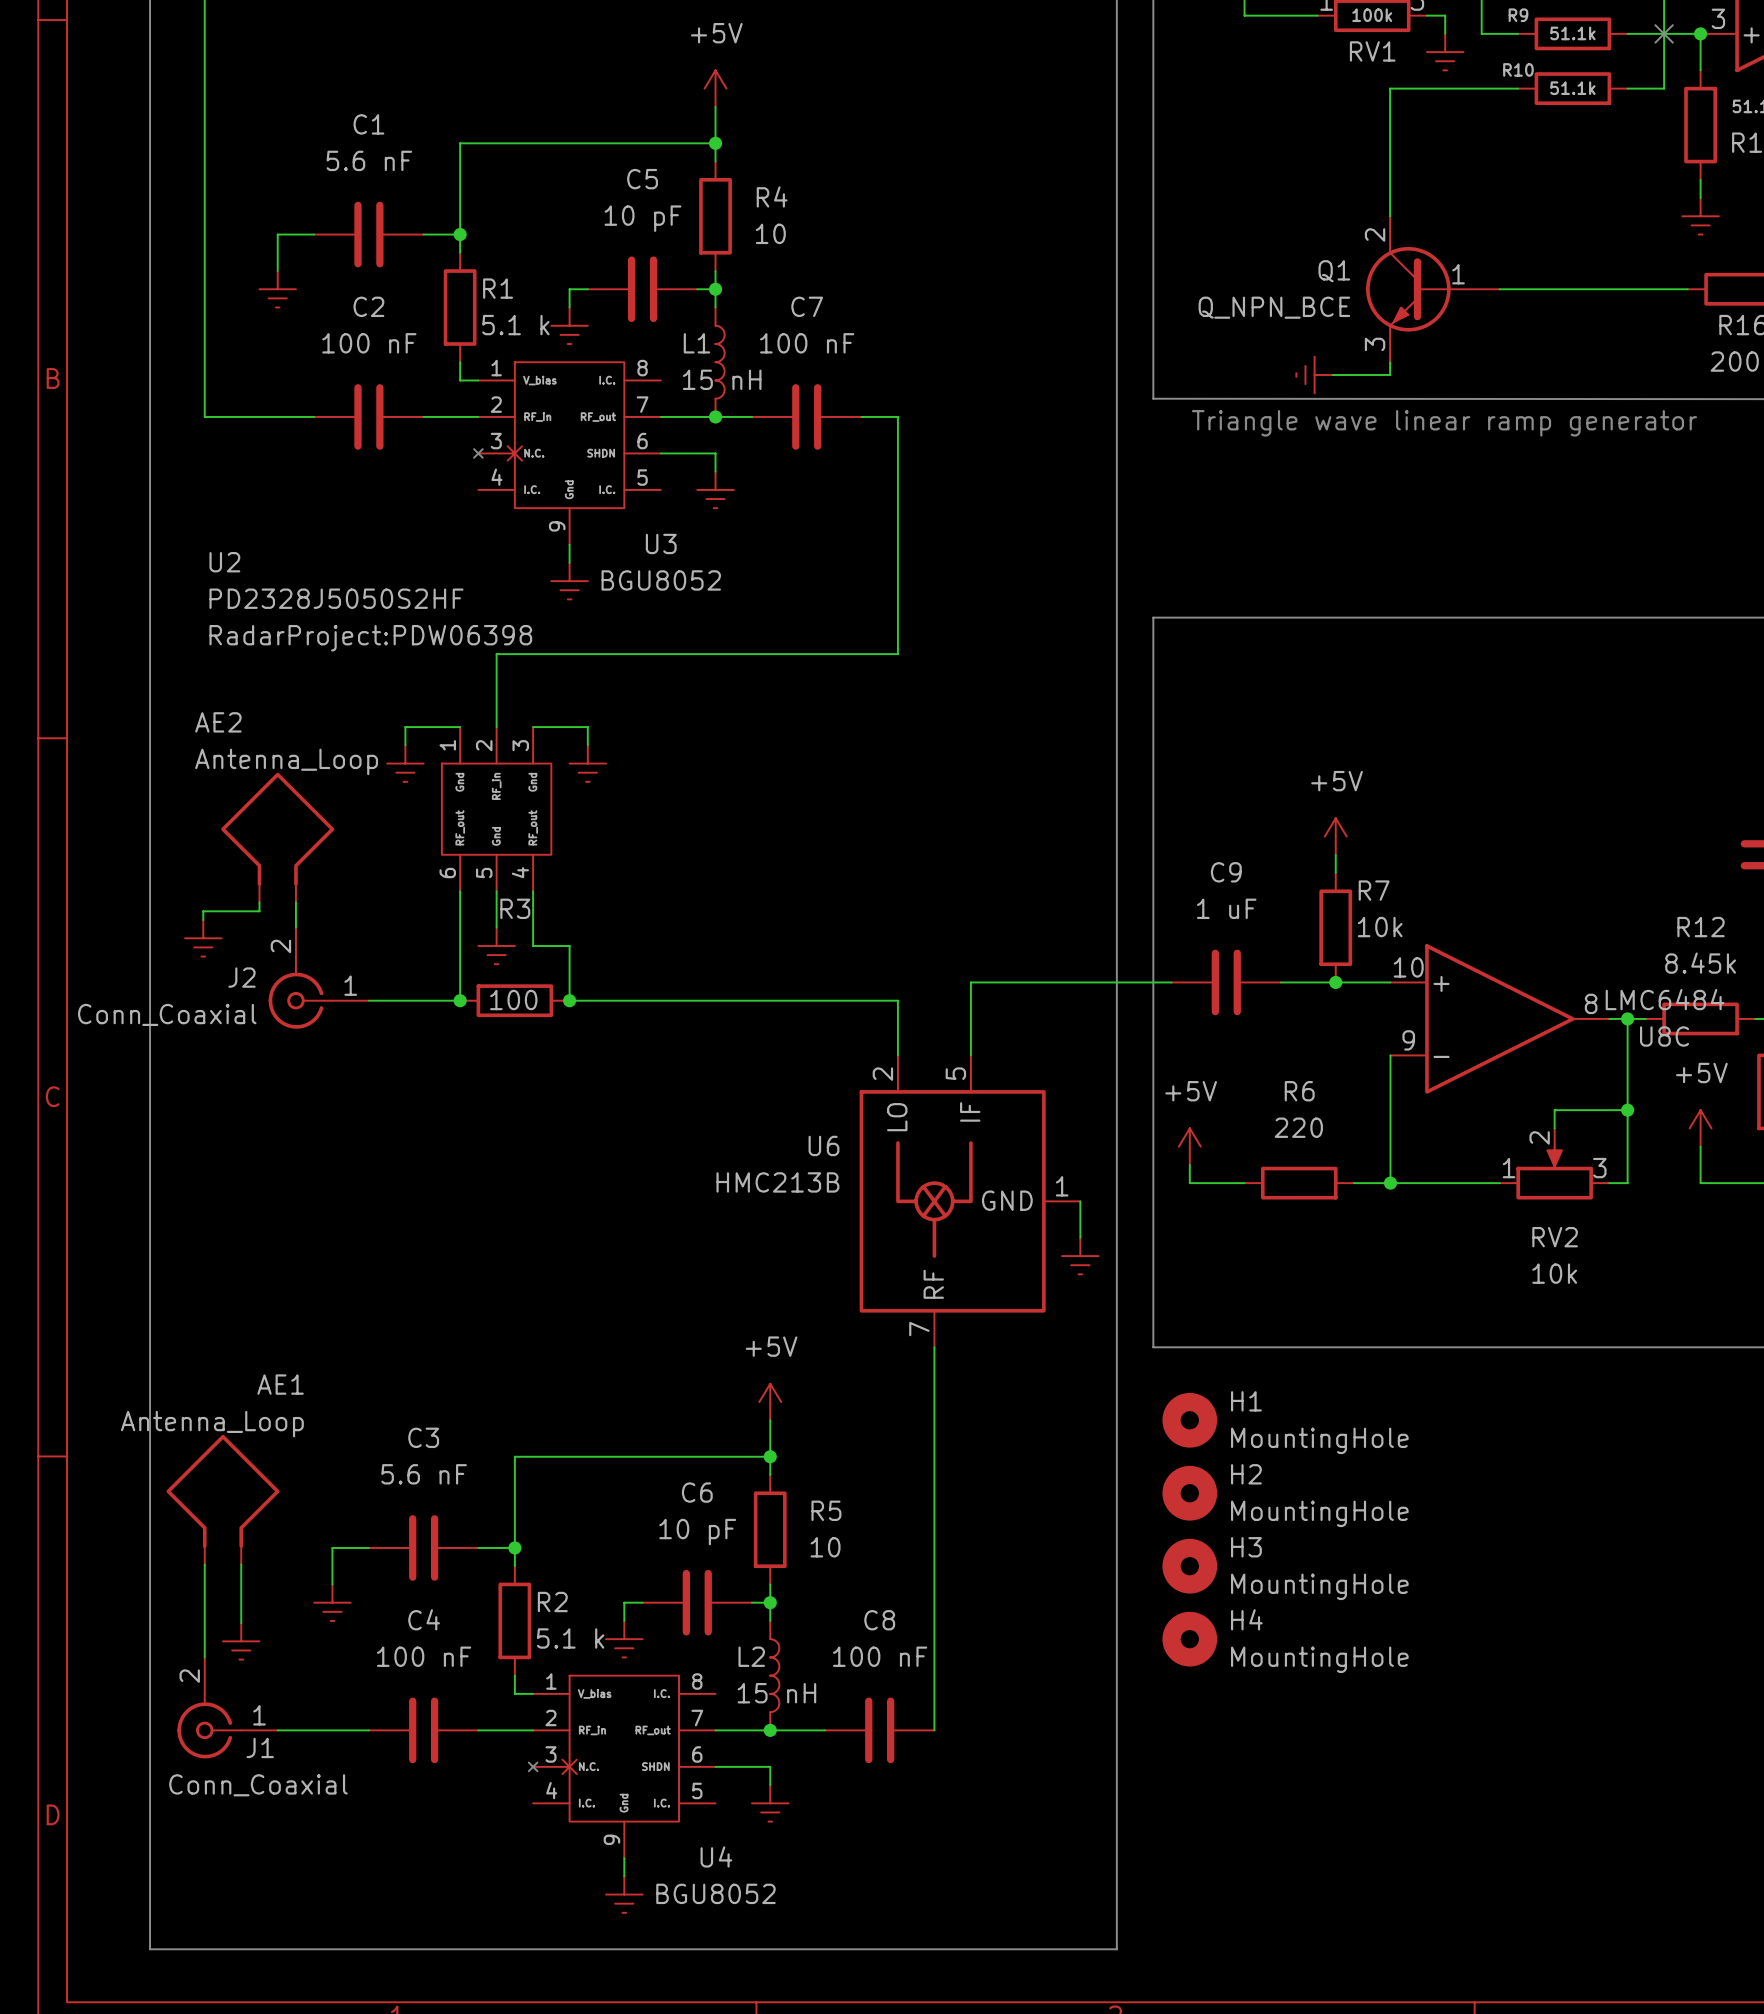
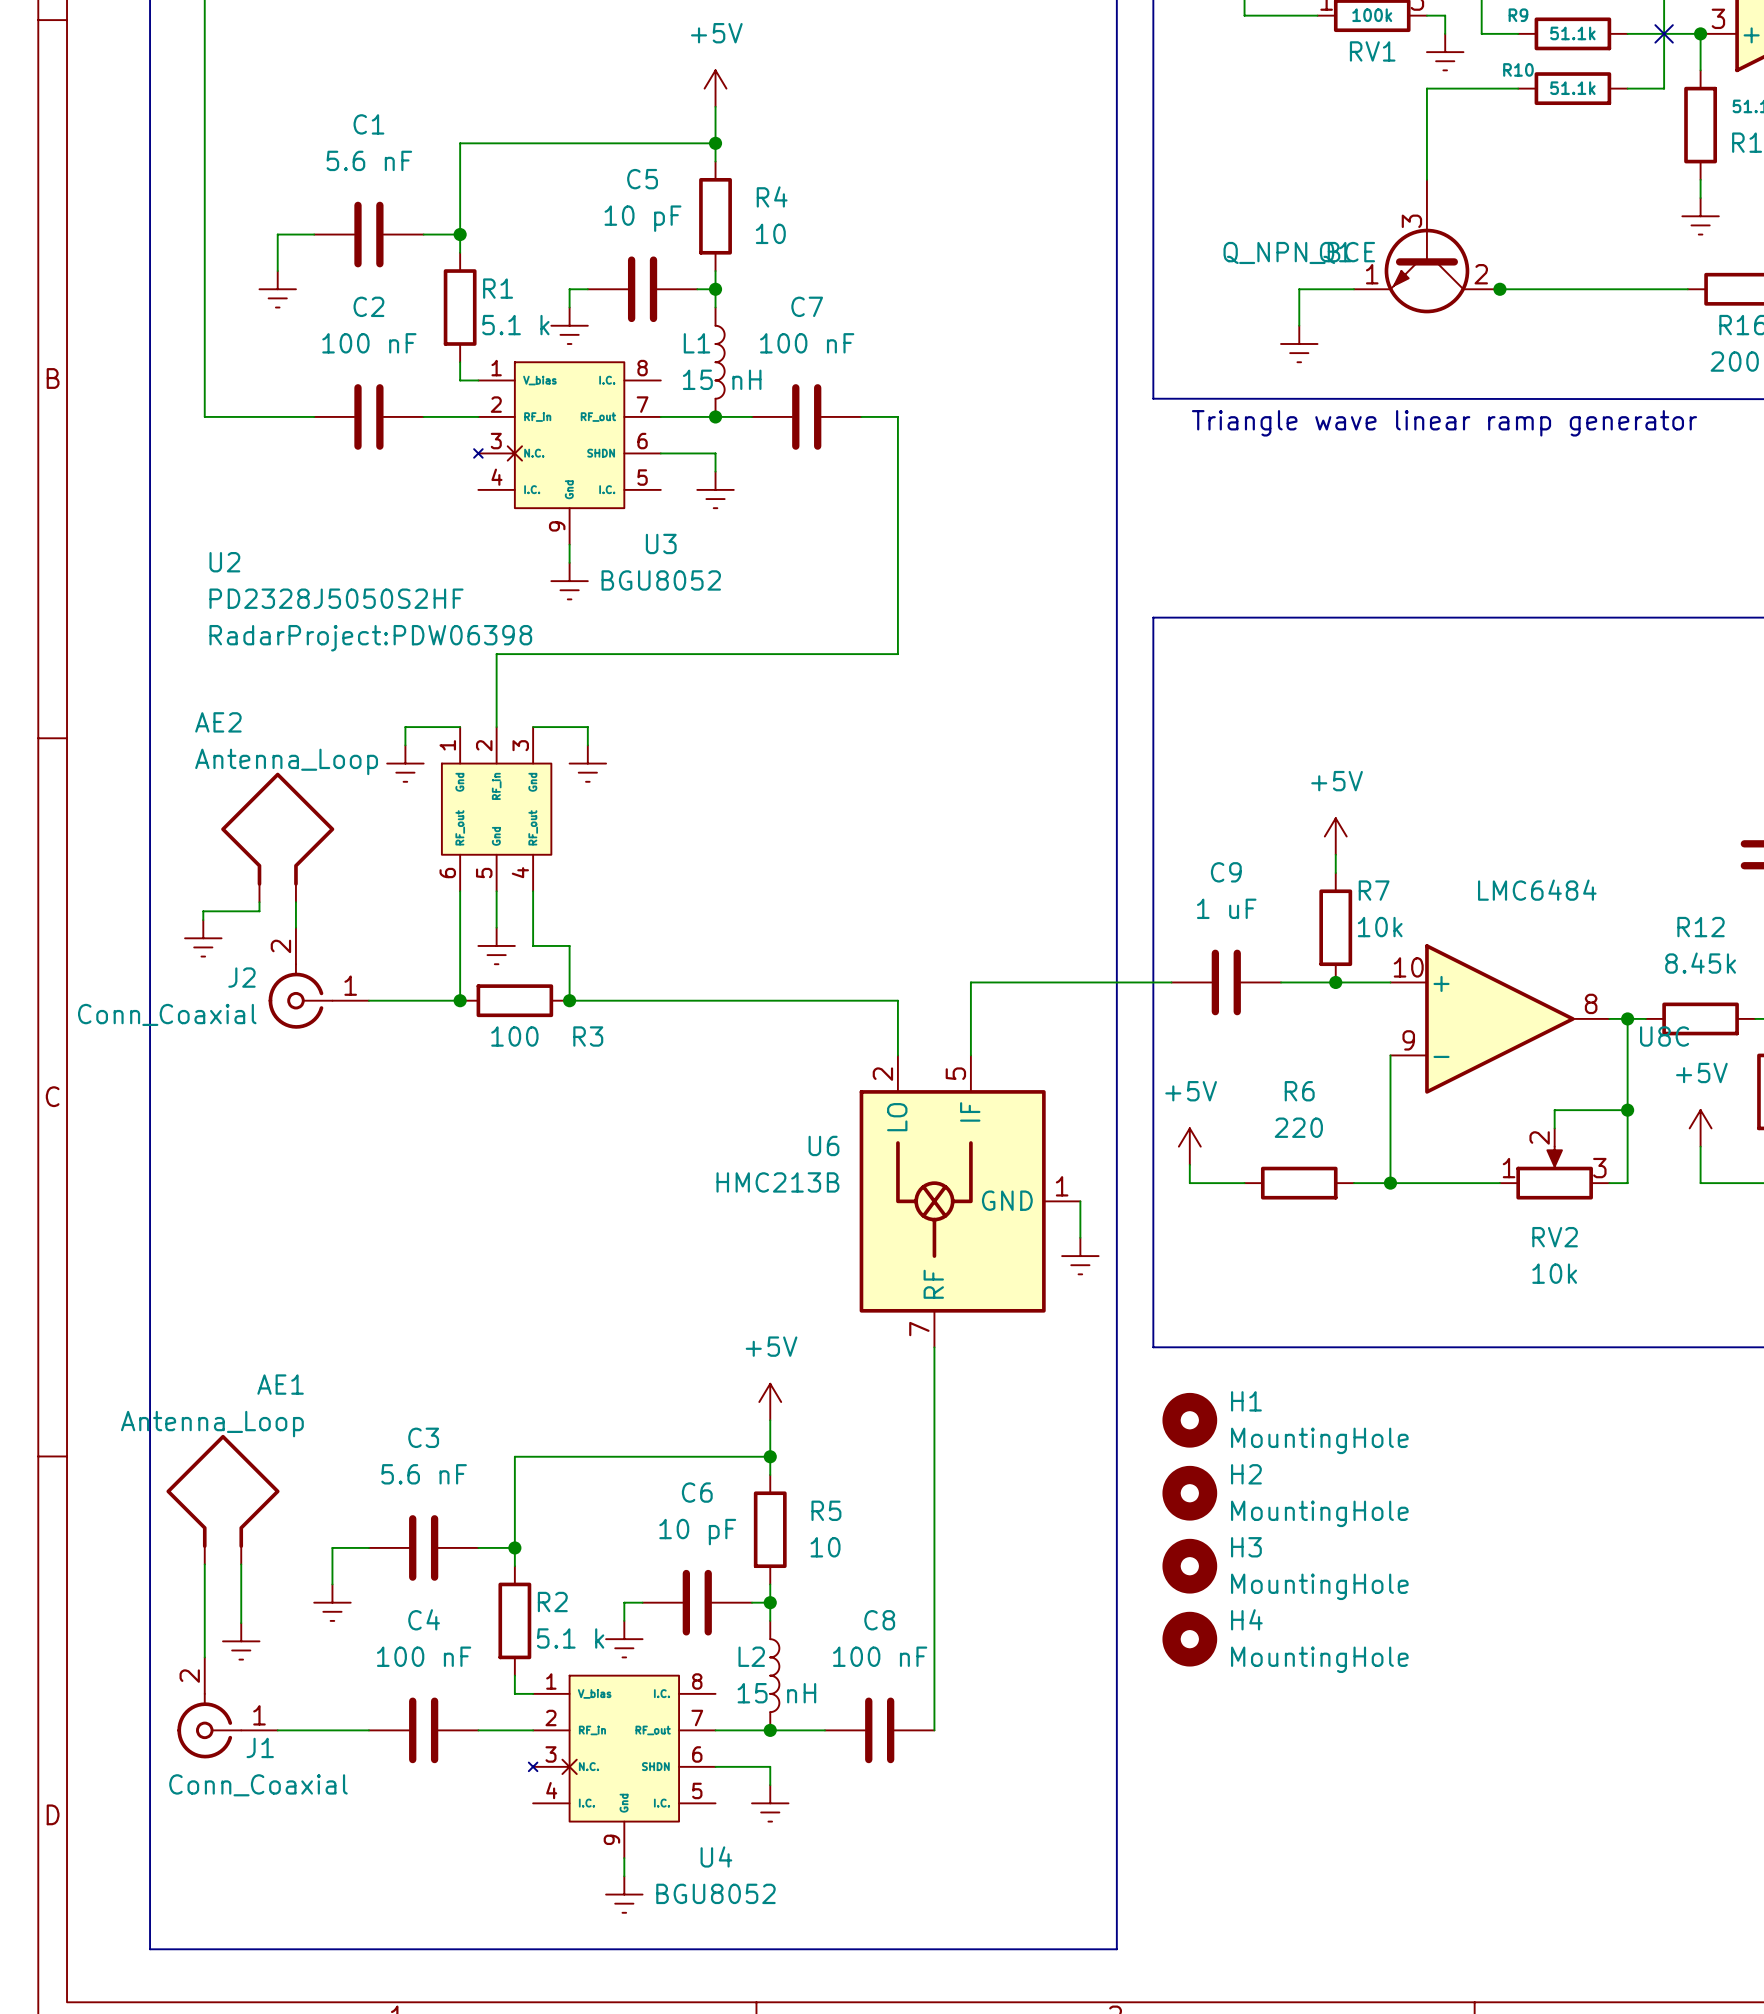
wire: (1426, 88) (1390, 88) (1390, 216) -> (1426, 88) (1426, 179)
Q1 symbol: [1366, 216, 1500, 363] -> [1354, 179, 1500, 314]
wire: none -> (1354, 289) (1299, 289) (1299, 325)
junction: none -> (1499, 289)
Q1 value position: Q_NPN_BCE (1274, 307) -> Q_NPN_BCE (1299, 252)
wire: (1390, 362) (1390, 375) (1332, 375) -> none
power symbol rotation: 0° (1314, 375) -> 90° counterclockwise (1299, 343)
power symbol position: (1314, 375) -> (1299, 343)
R3 name position: R3 (515, 908) -> R3 (588, 1036)
U8C value position: LMC6484 (1664, 999) -> LMC6484 (1537, 890)
R3 value position: 100 (513, 1000) -> 100 (514, 1036)

